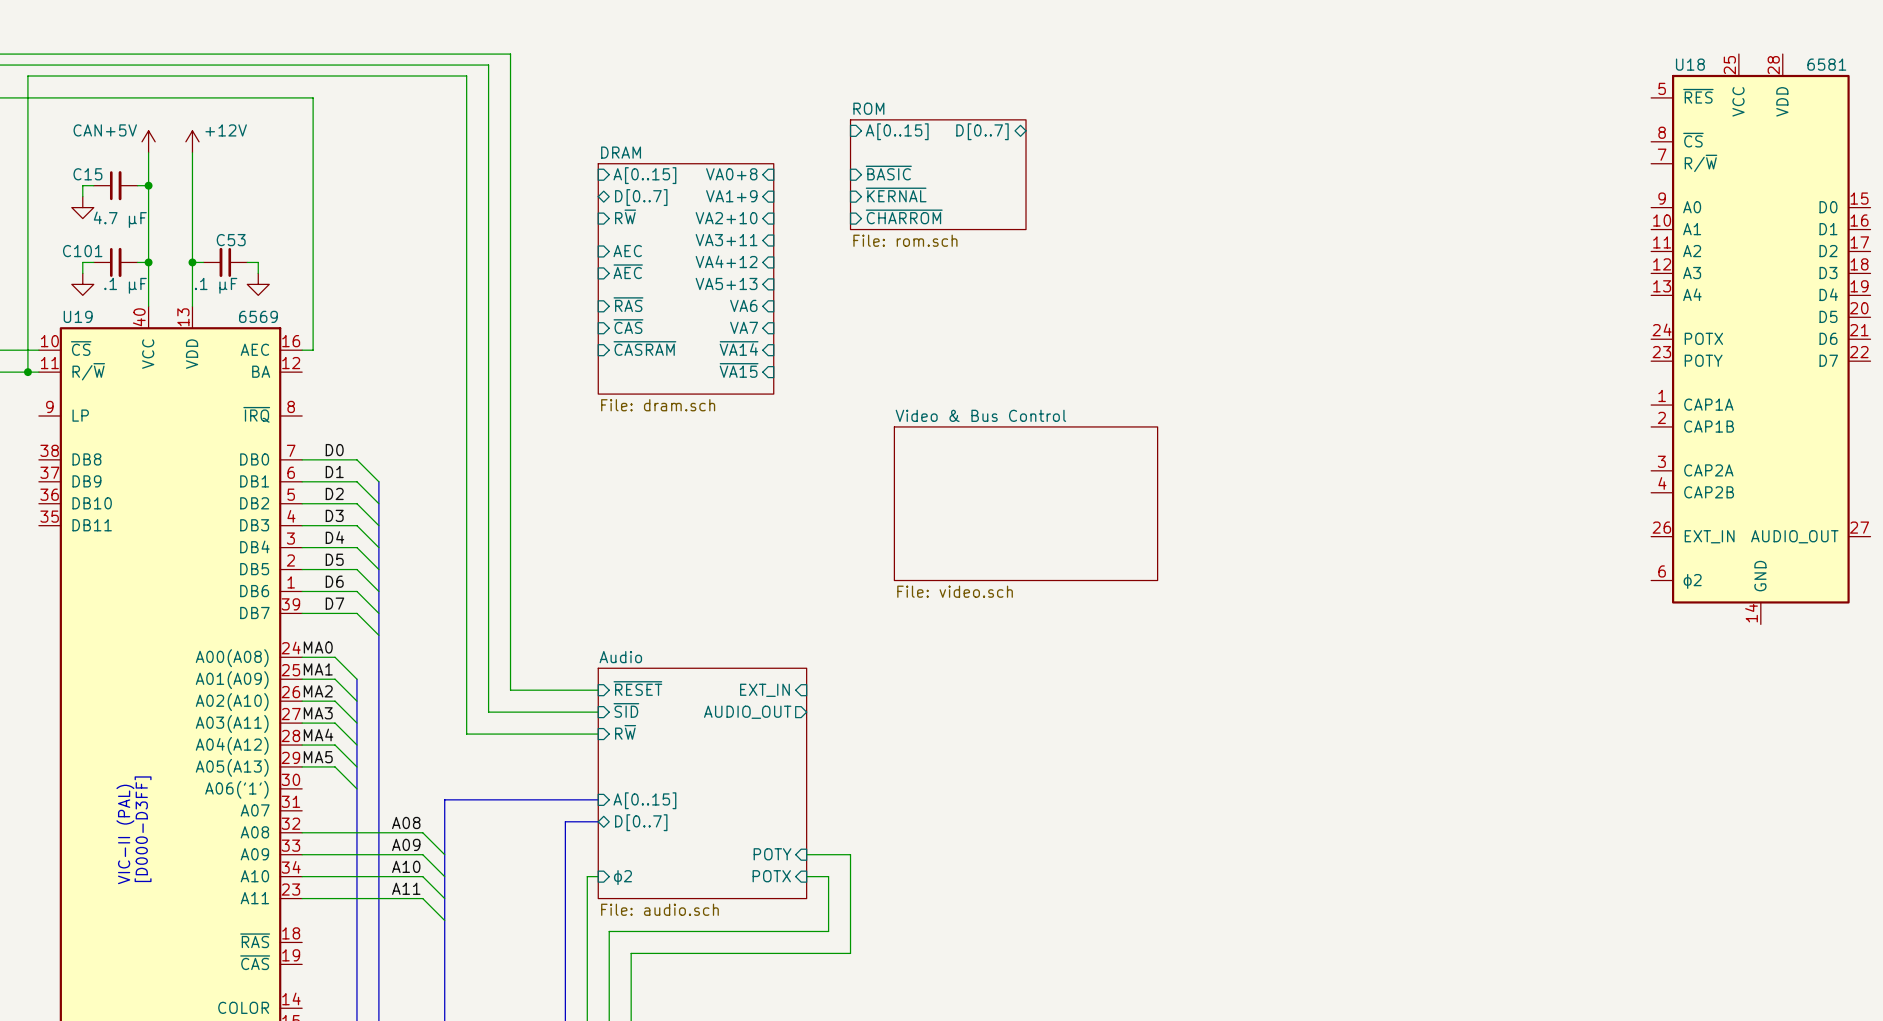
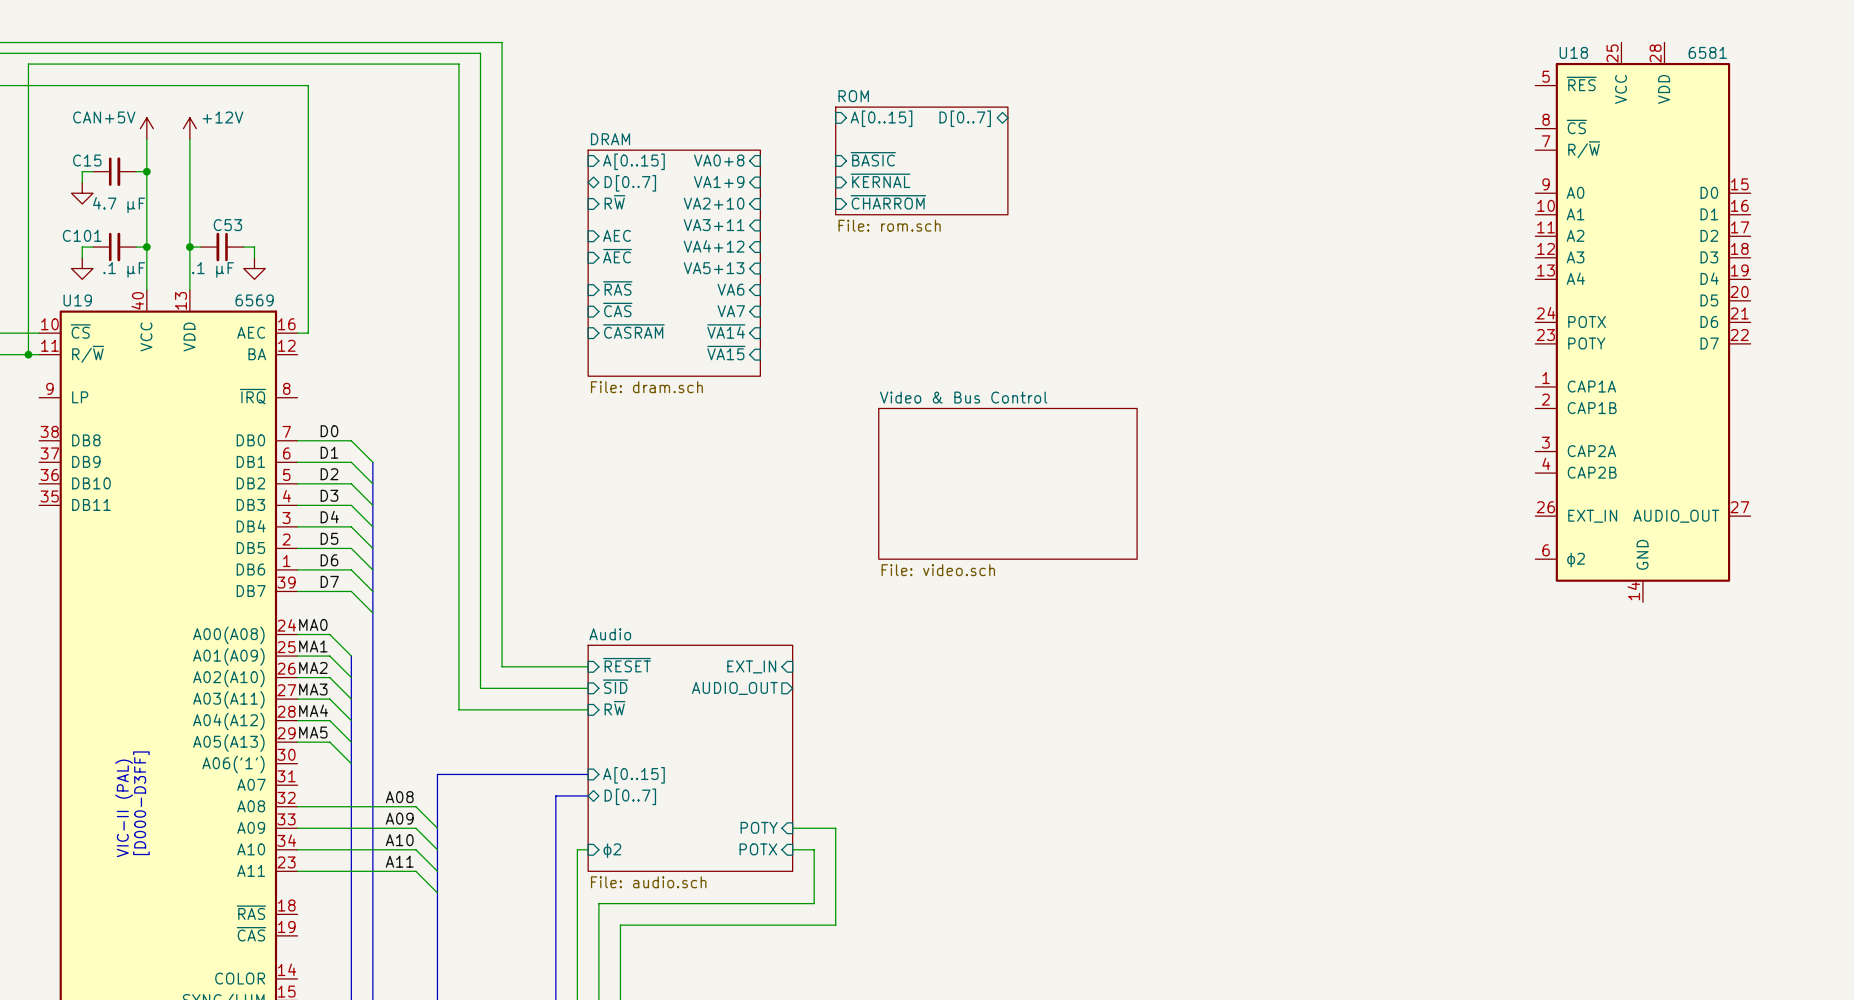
U18 position: (1760, 339) -> (1642, 322)

